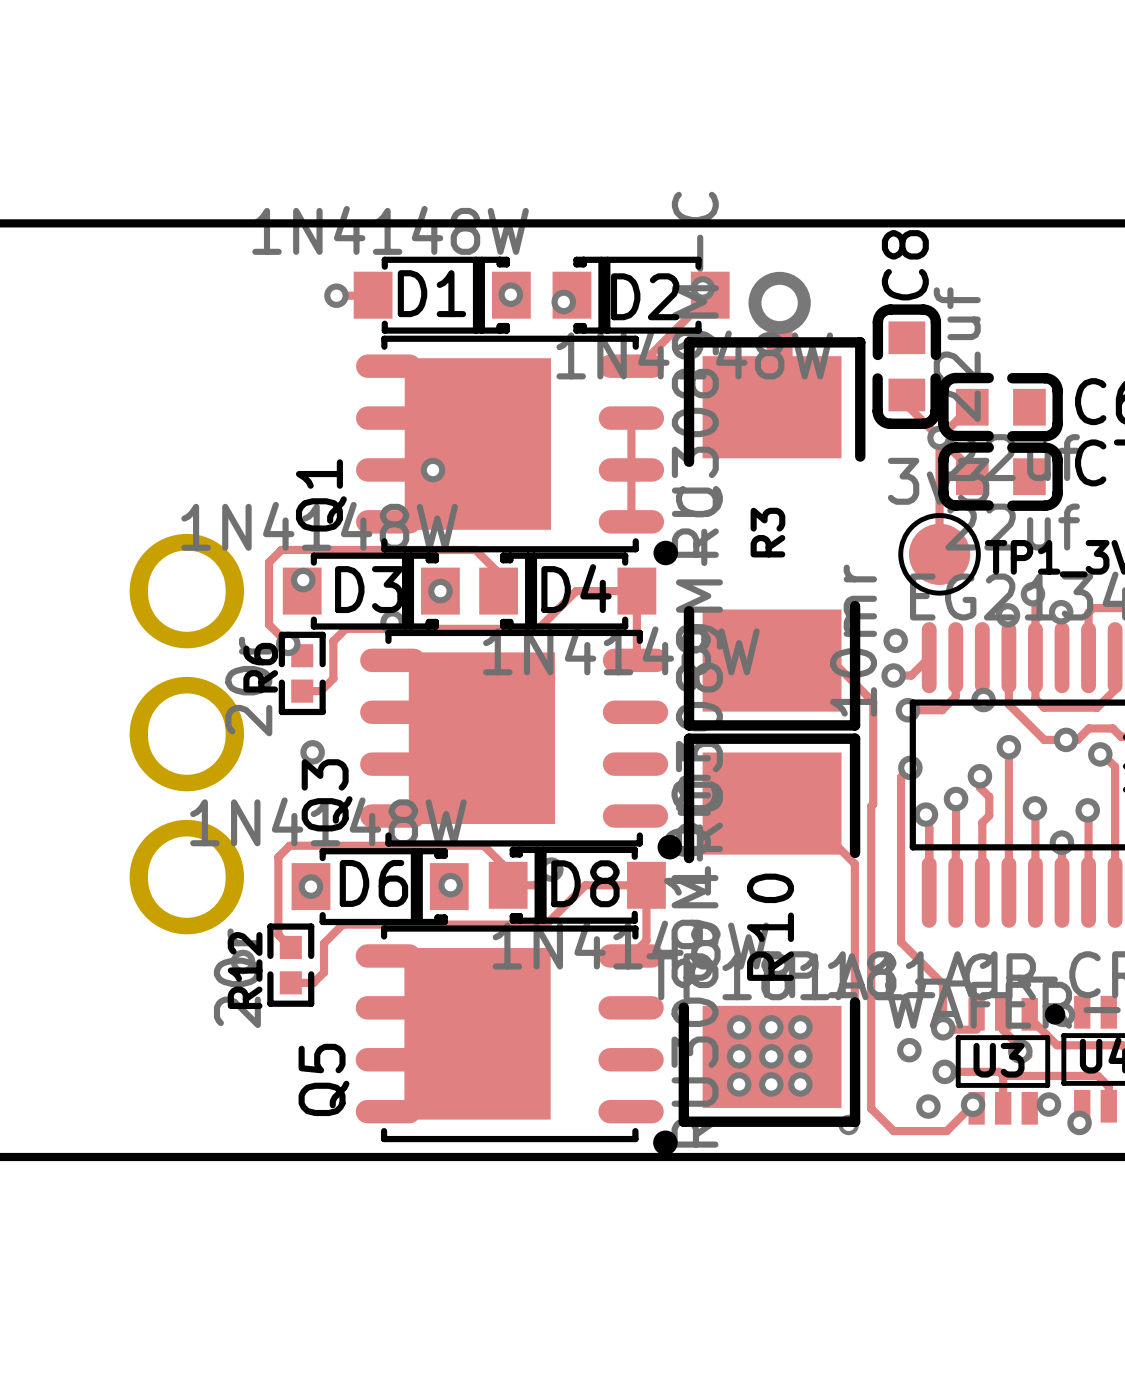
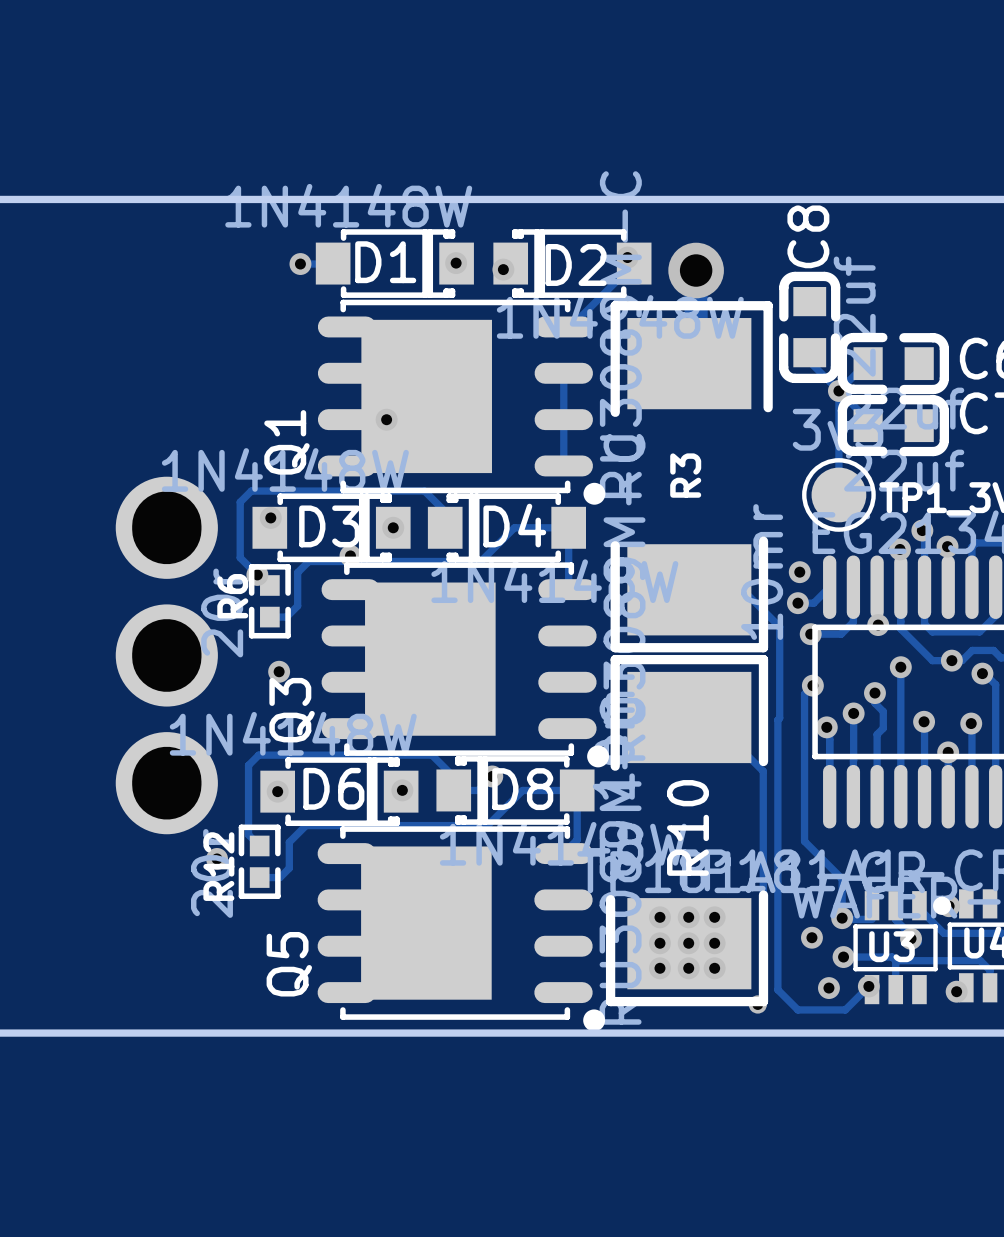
via: (1048, 1104) -> none
via: none -> (956, 991)
via: (1079, 1122) -> none

